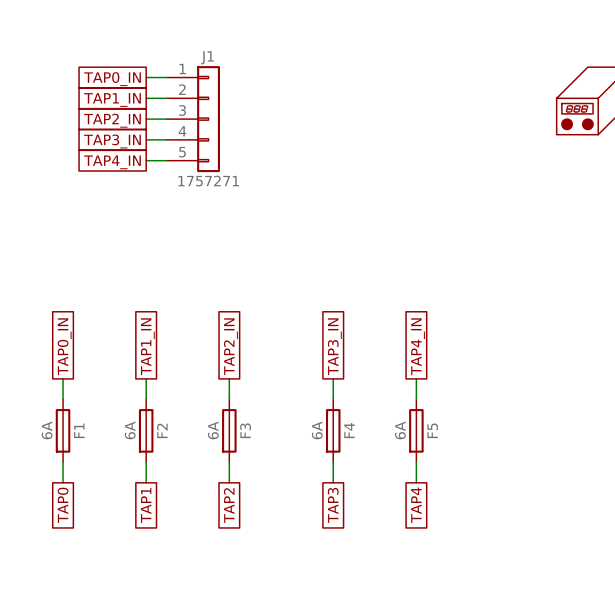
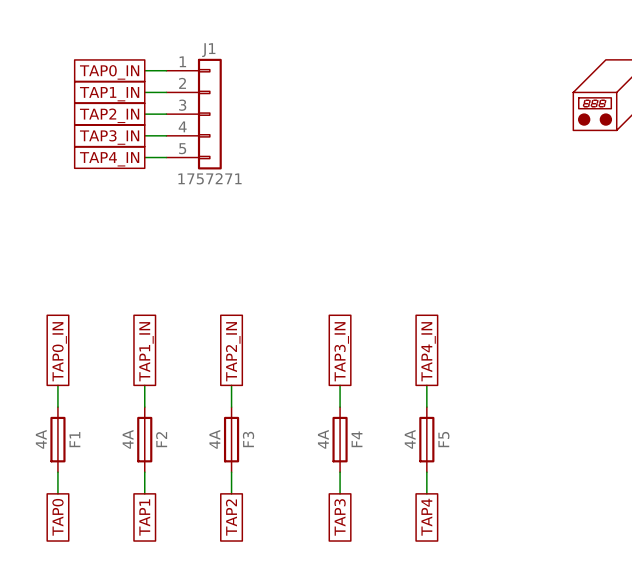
F1 value: 6A (47, 430) -> 4A (41, 439)
F2 value: 6A (130, 430) -> 4A (128, 439)
F3 value: 6A (213, 430) -> 4A (214, 439)
F4 value: 6A (317, 430) -> 4A (323, 439)
F5 value: 6A (400, 430) -> 4A (410, 439)

